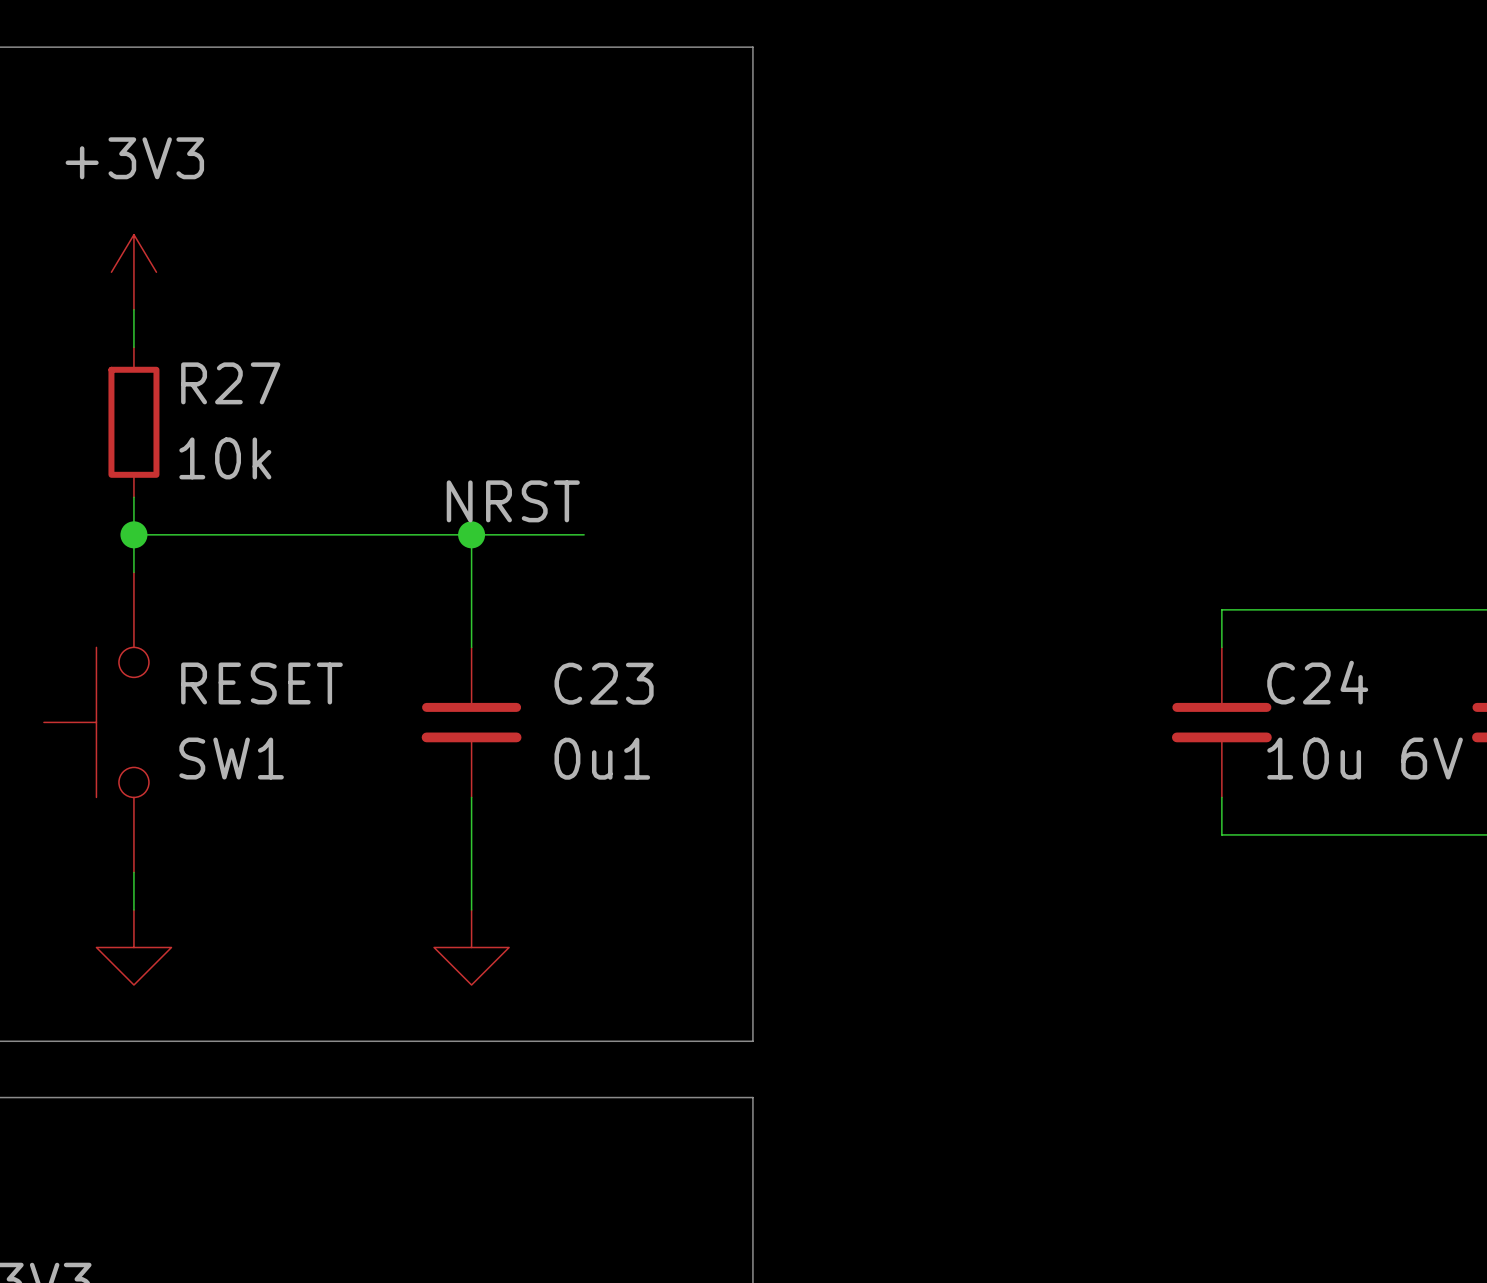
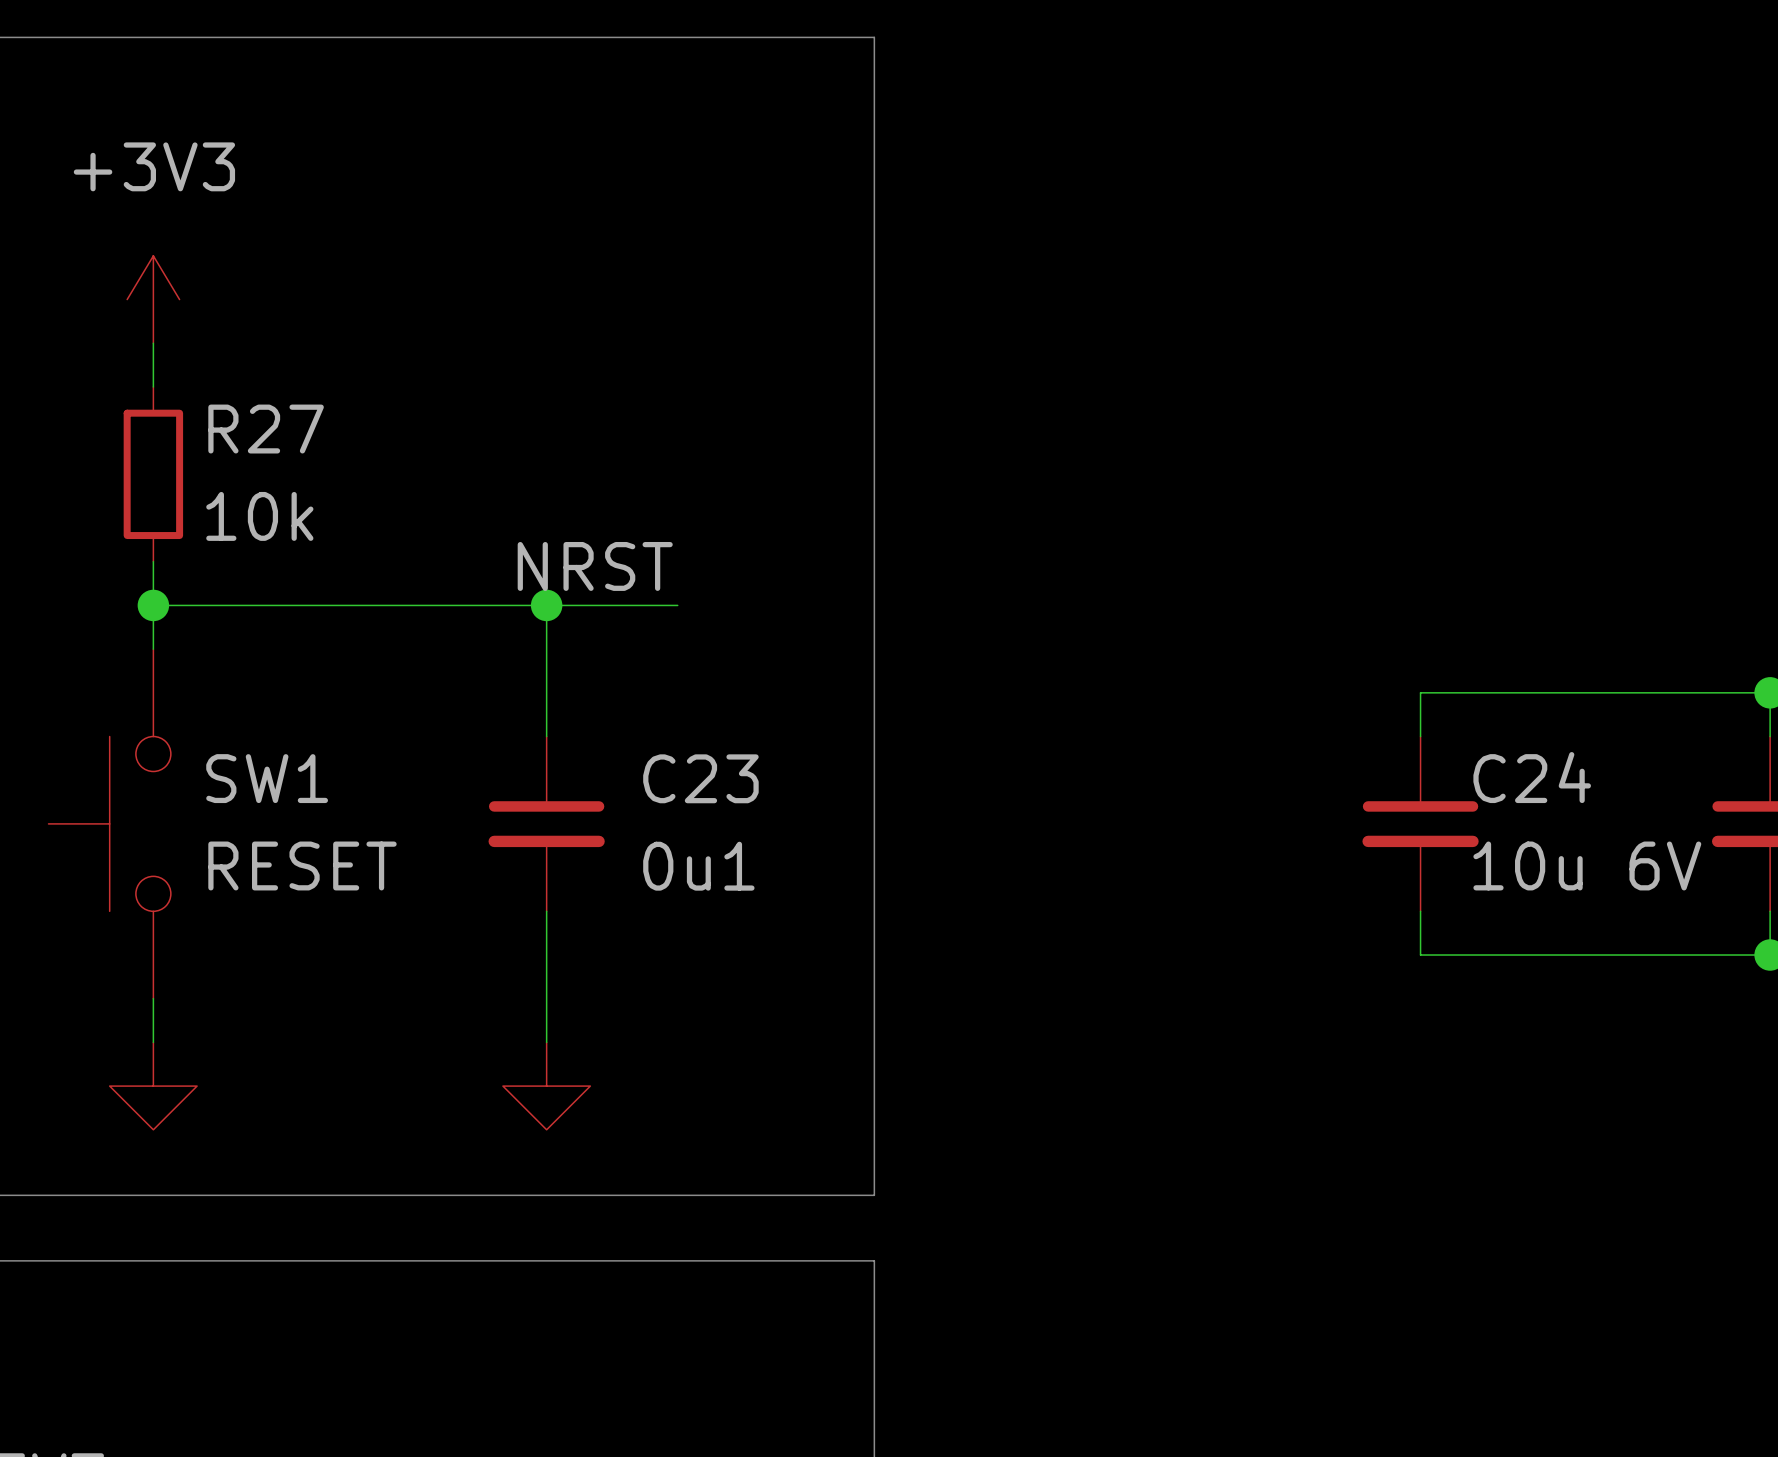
SW1 value position: RESET (261, 683) -> RESET (302, 865)
SW1 name position: SW1 (231, 758) -> SW1 (267, 778)

